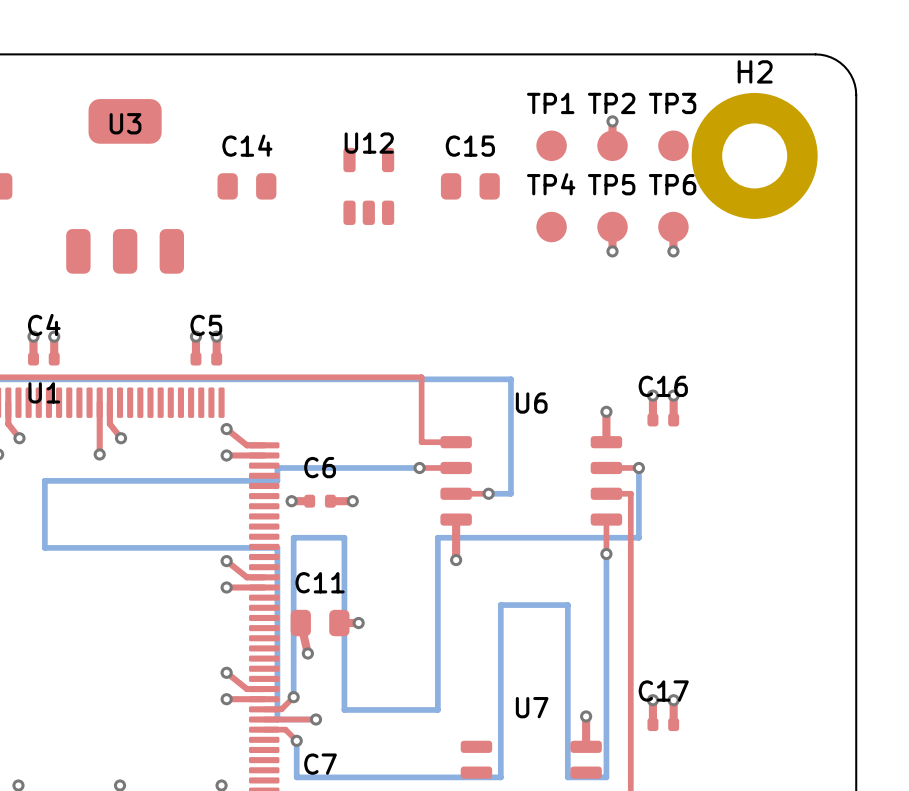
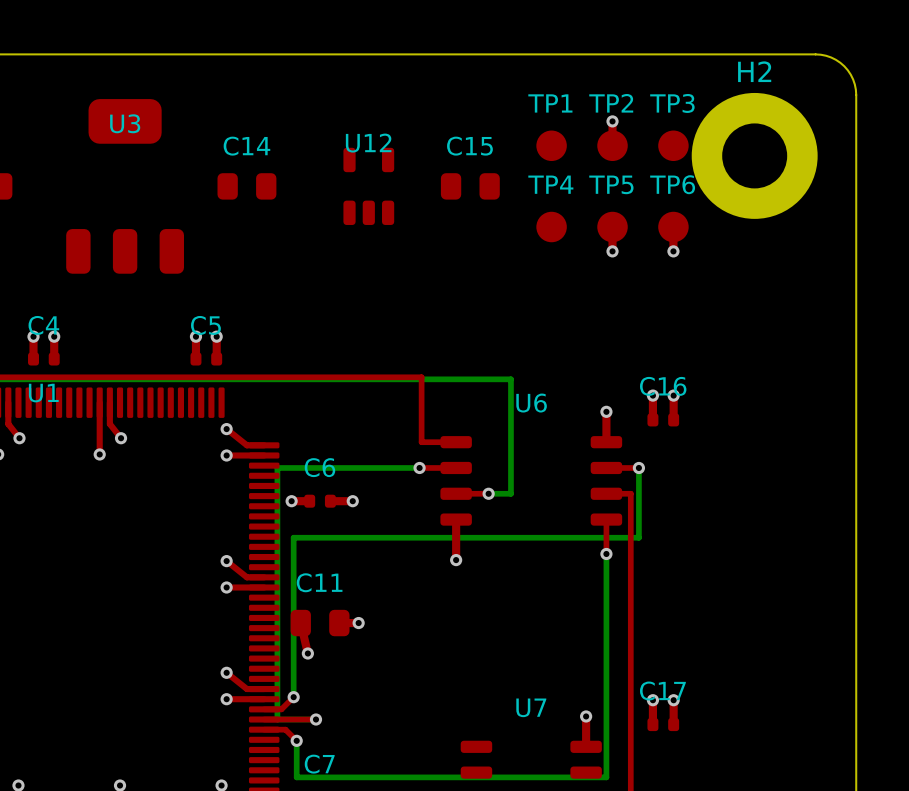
bottom track: (277, 480) (44, 480) (44, 547) (277, 547) -> (277, 480) (277, 547)
bottom track: (344, 537) (344, 709) (437, 709) (437, 537) -> (344, 537) (437, 537)
bottom track: (500, 777) (500, 605) (567, 605) (567, 777) -> (500, 777) (567, 777)

